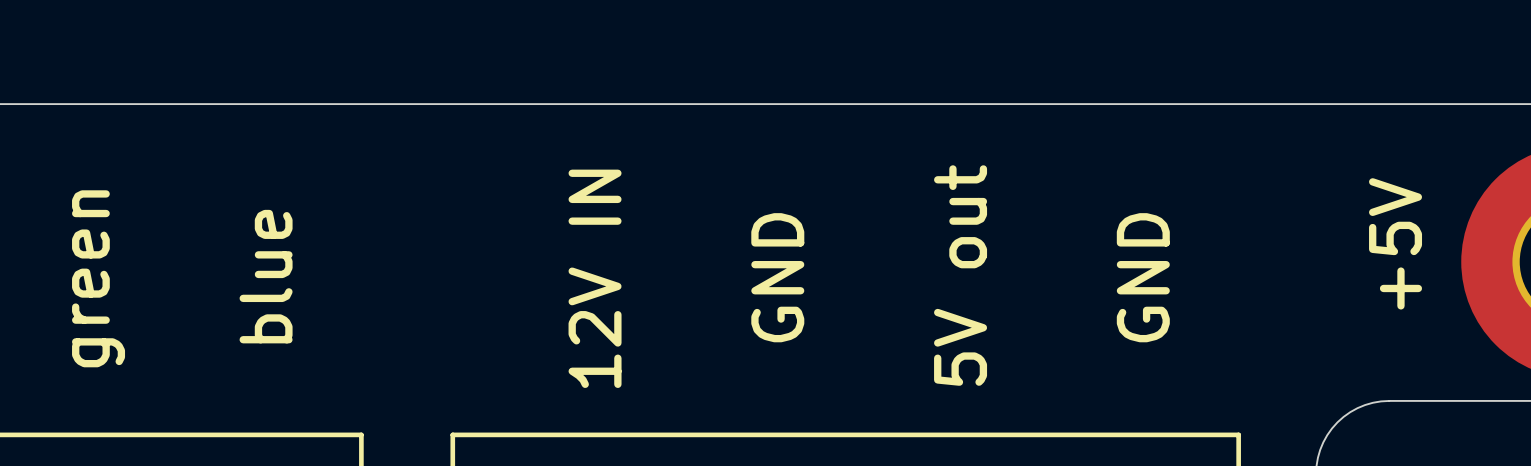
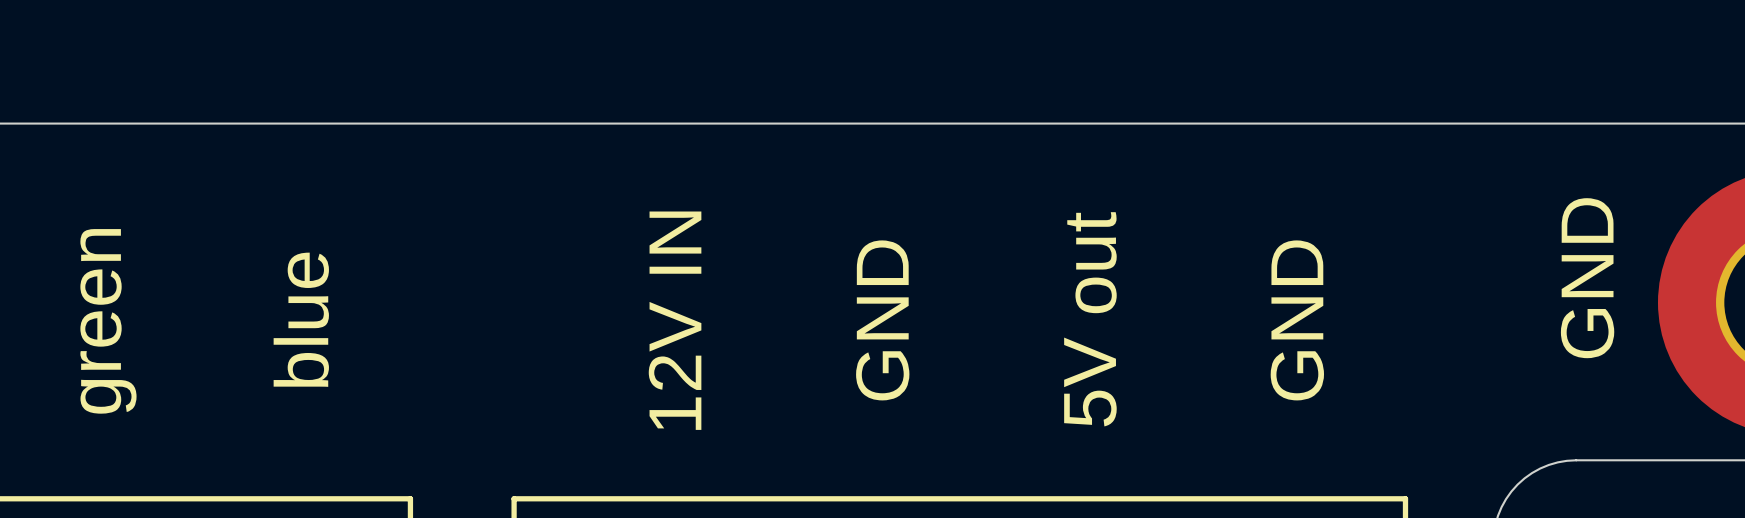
text: +5V (1395, 243) -> GND (1587, 278)

